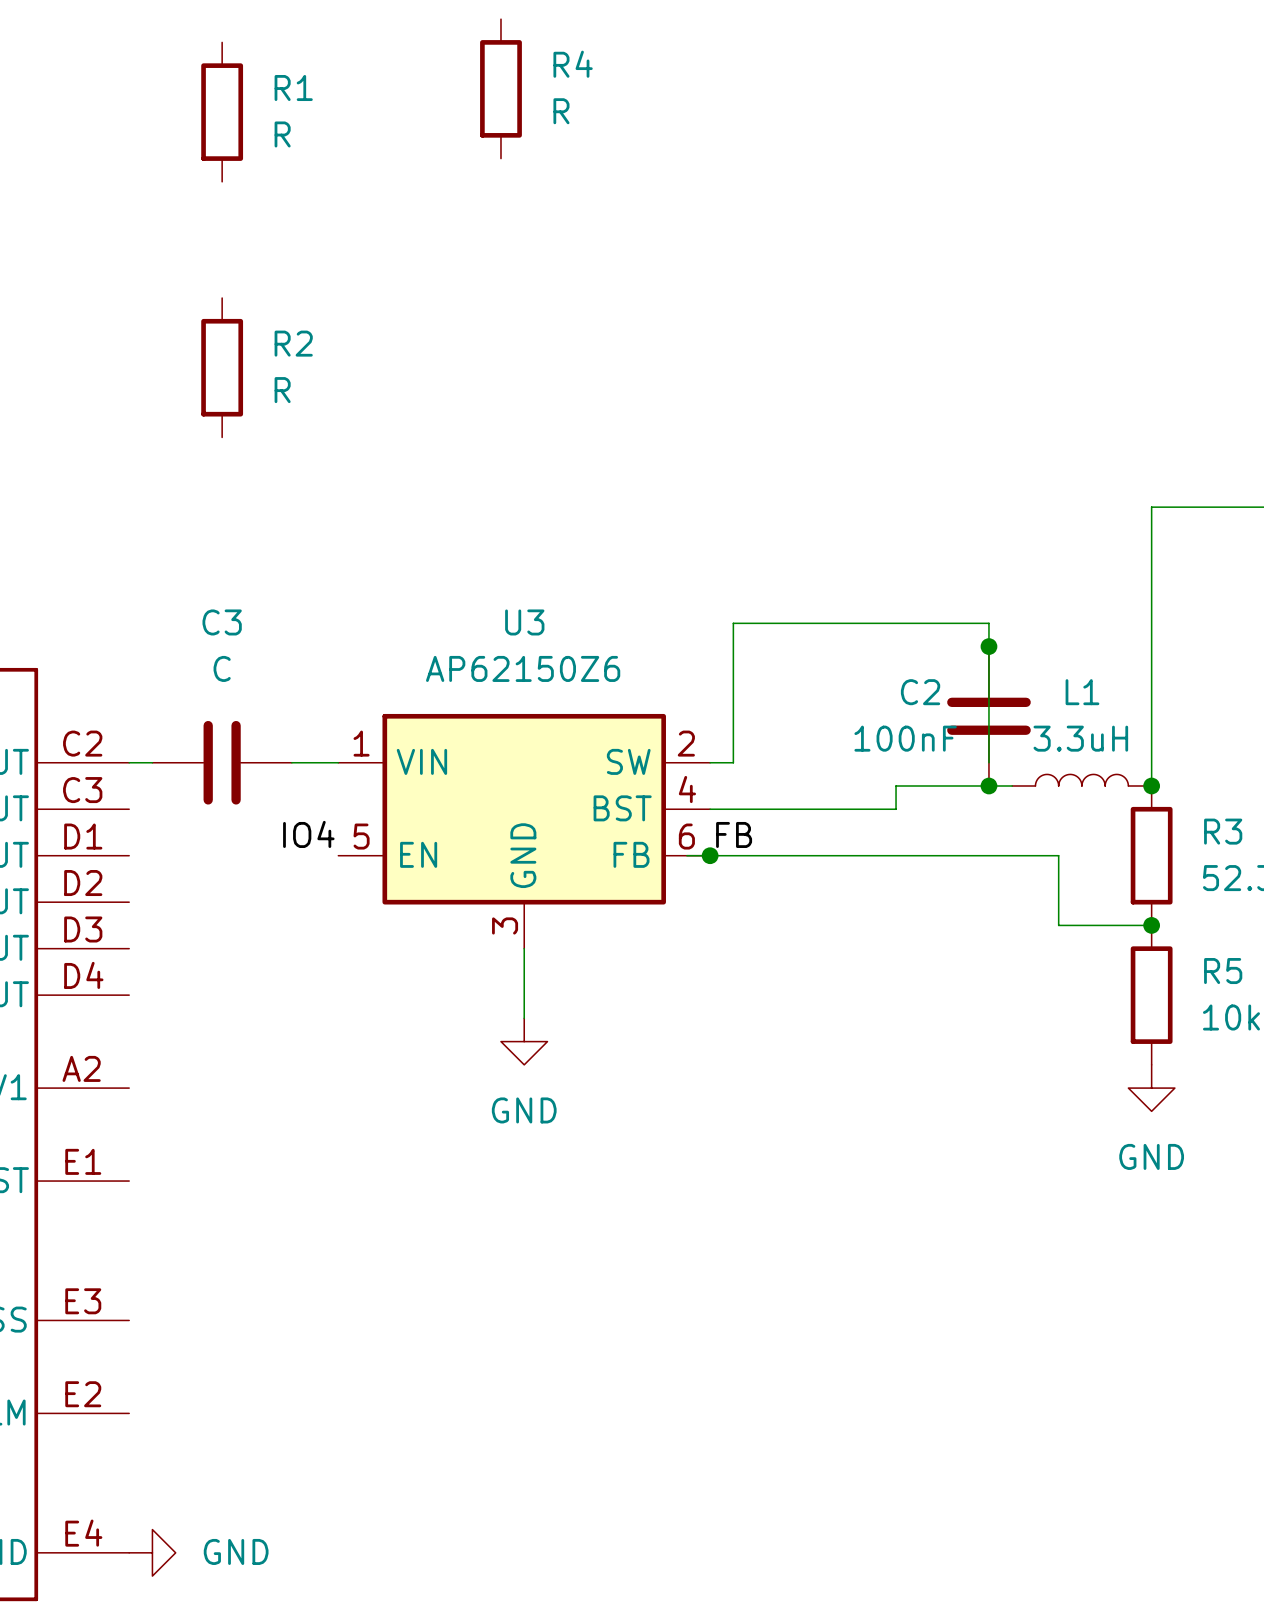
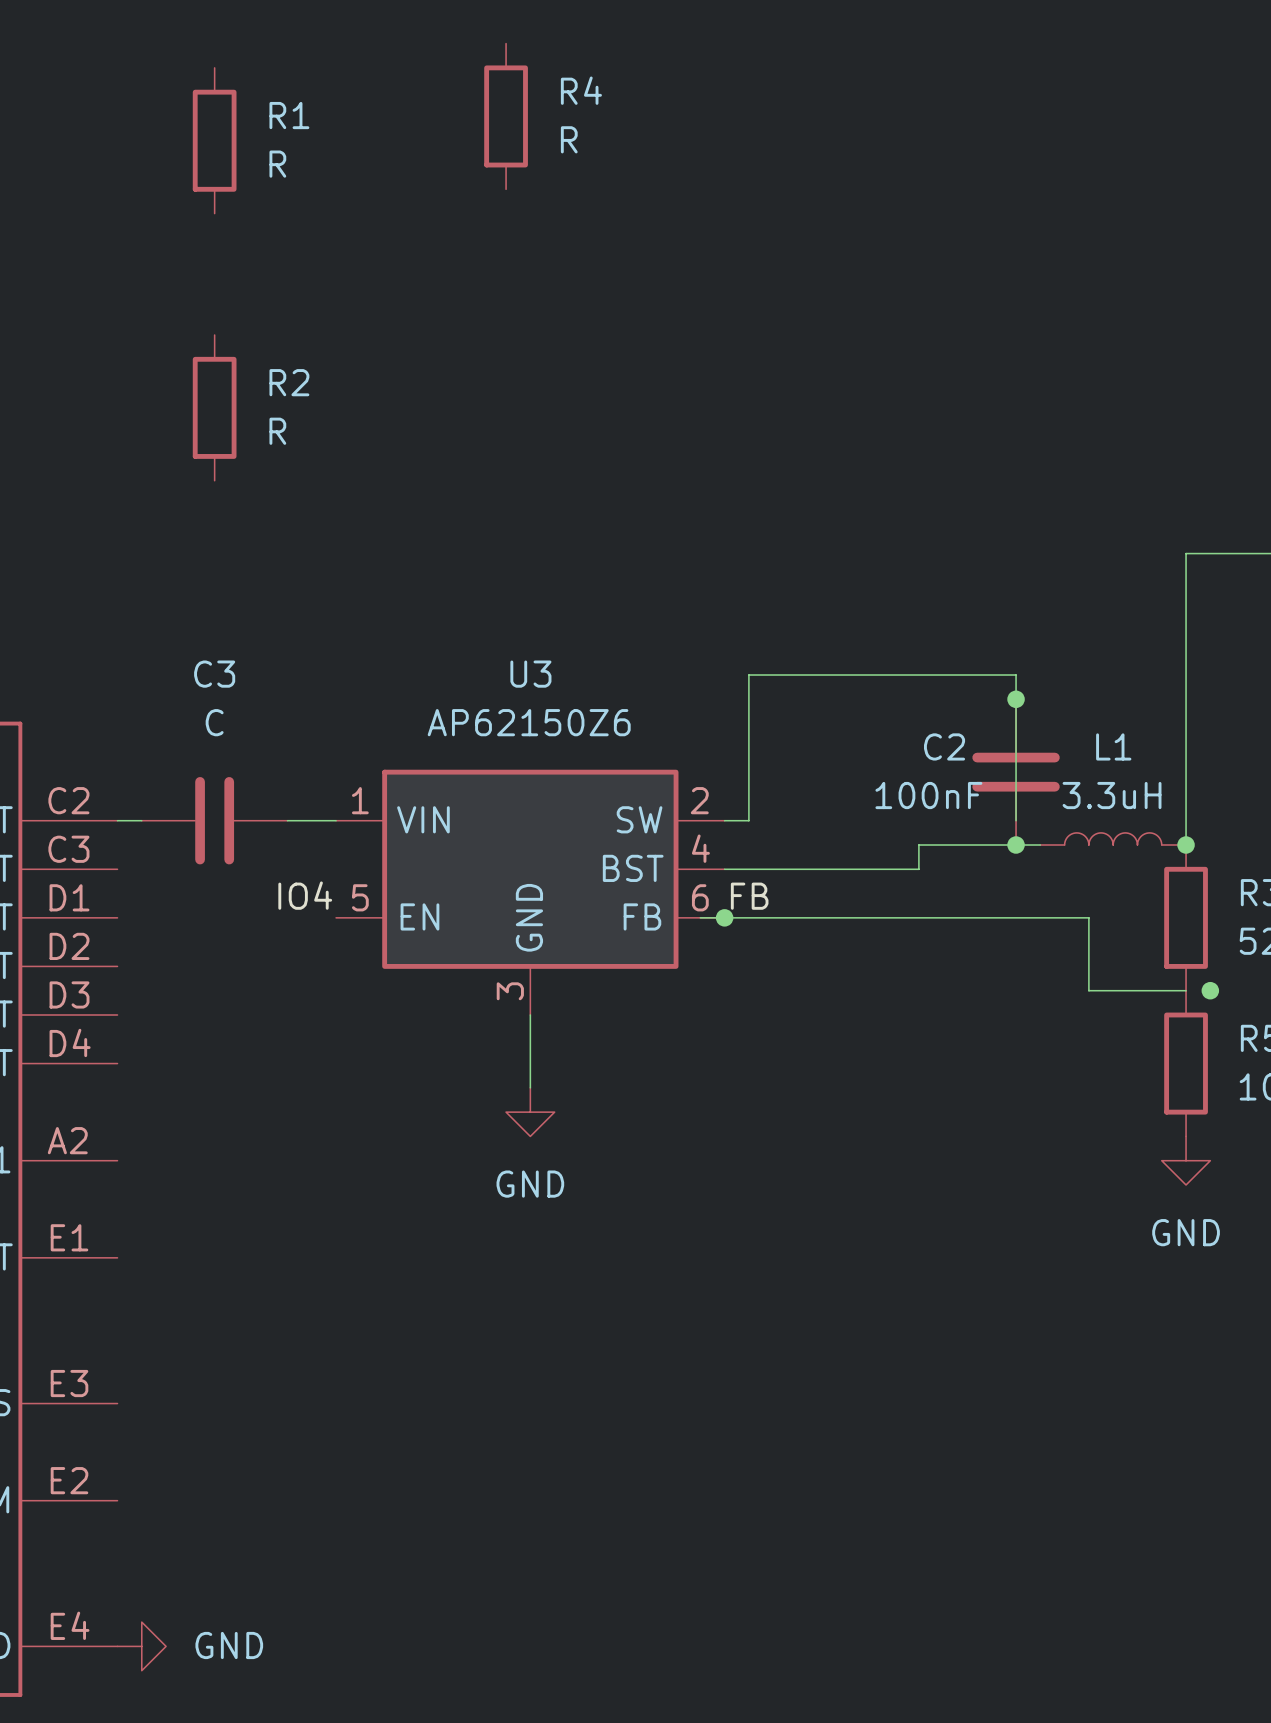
junction position: (1151, 925) -> (1210, 990)

